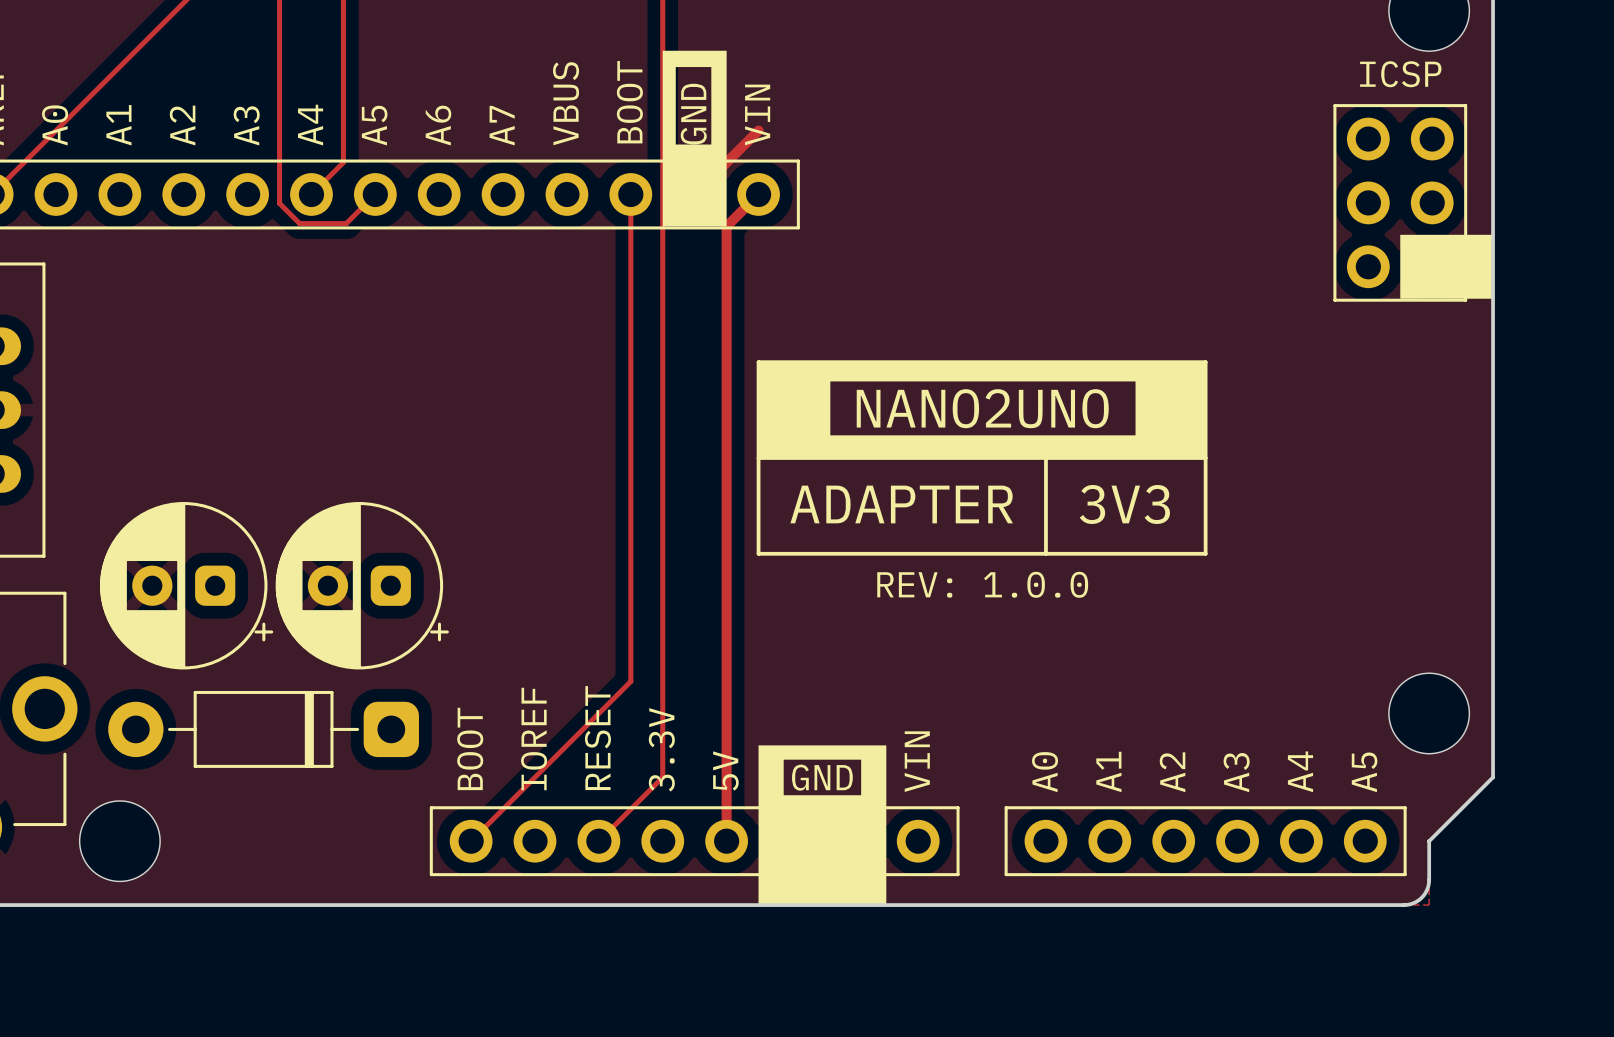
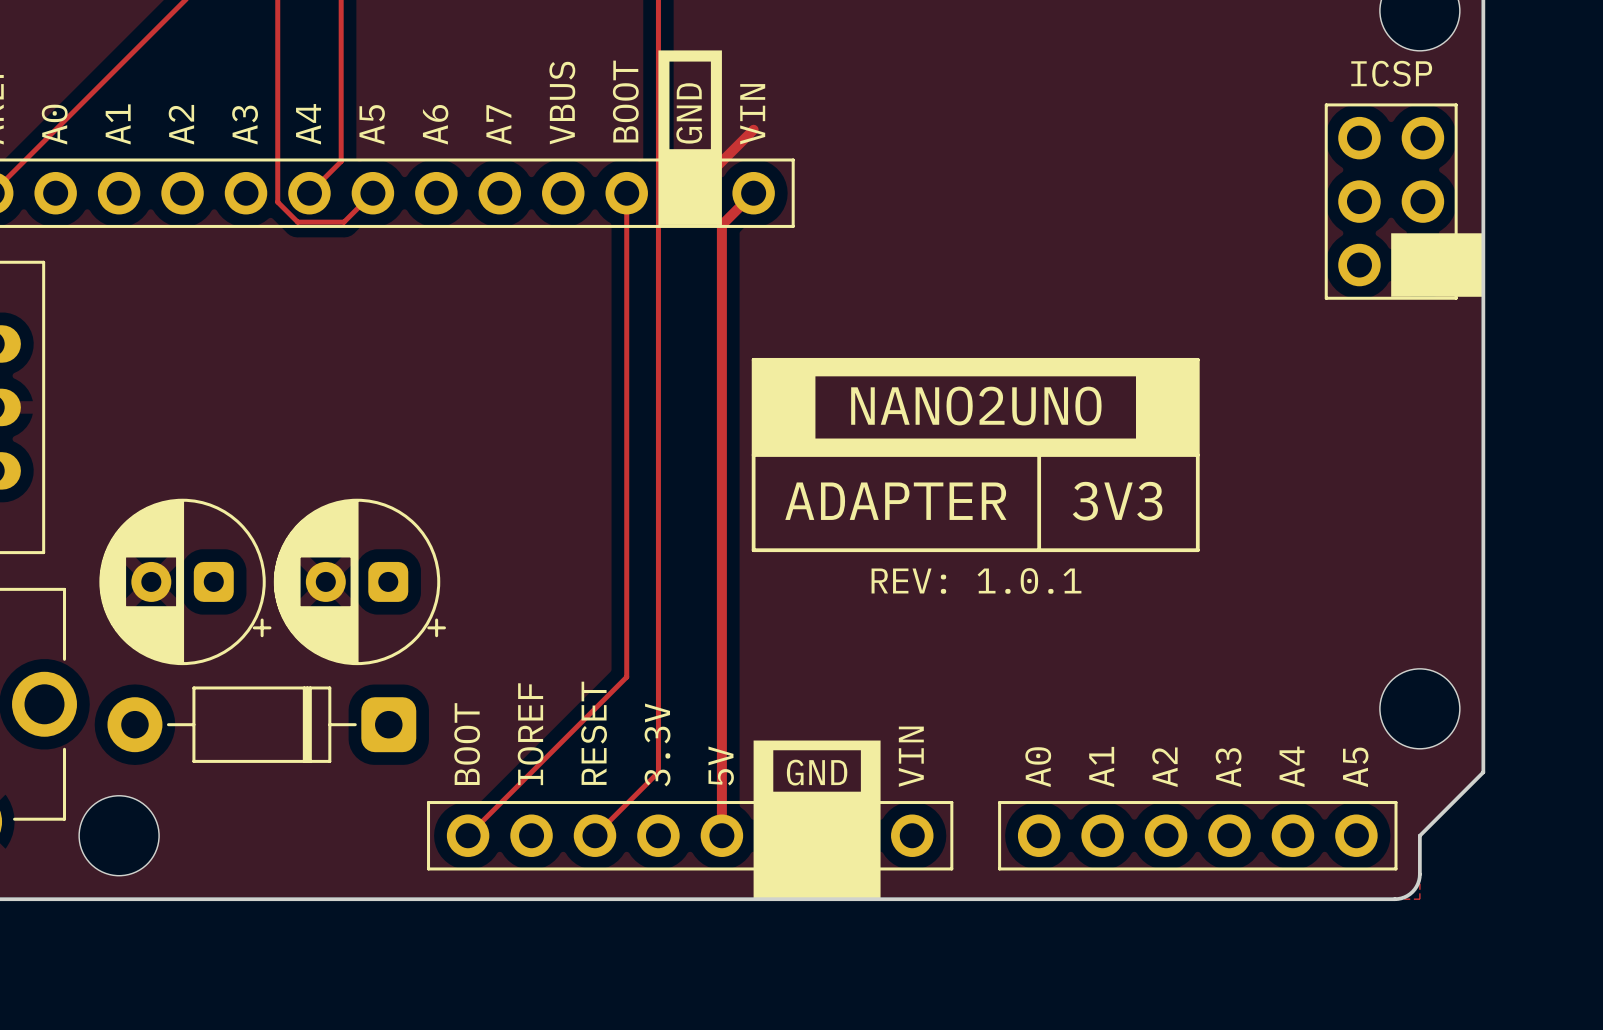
drawing shape: [662, 50, 727, 227] -> [658, 50, 722, 225]
drawing shape: [758, 362, 1206, 459] -> [753, 359, 1198, 456]
text: REV: 1.0.0 (982, 584) -> REV: 1.0.1 (976, 580)
drawing shape: [758, 745, 887, 906] -> [753, 740, 881, 900]

